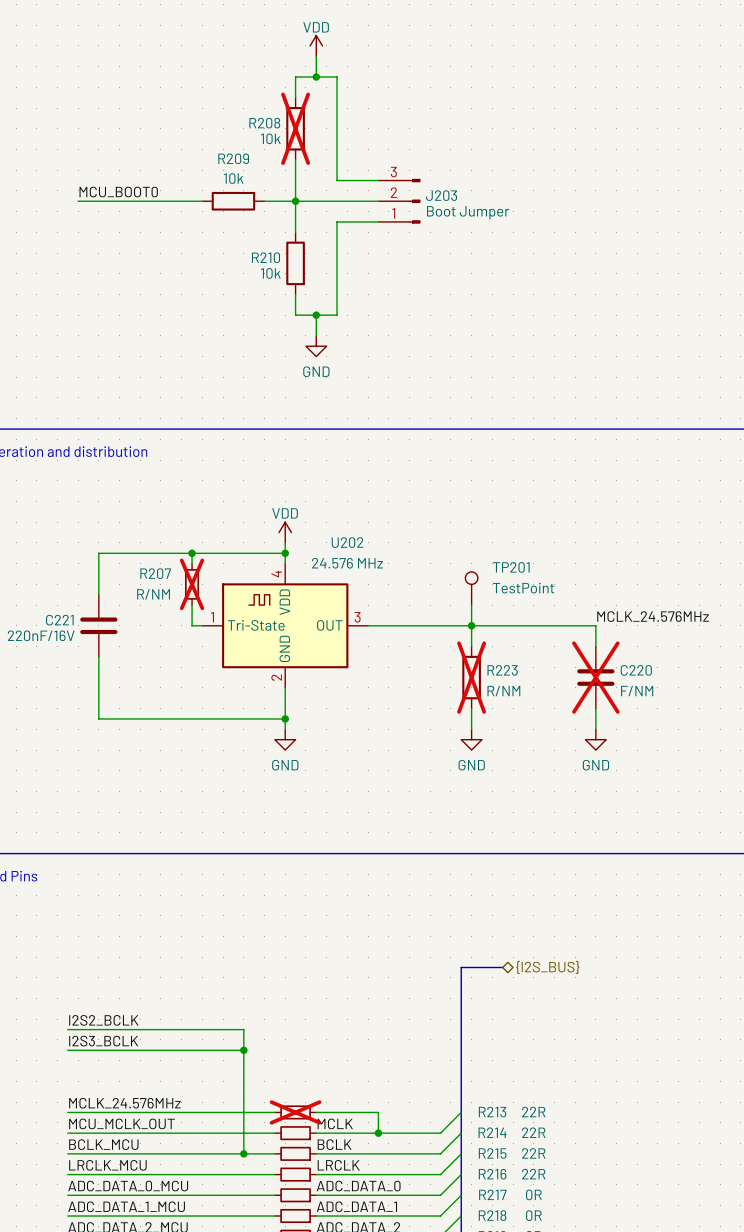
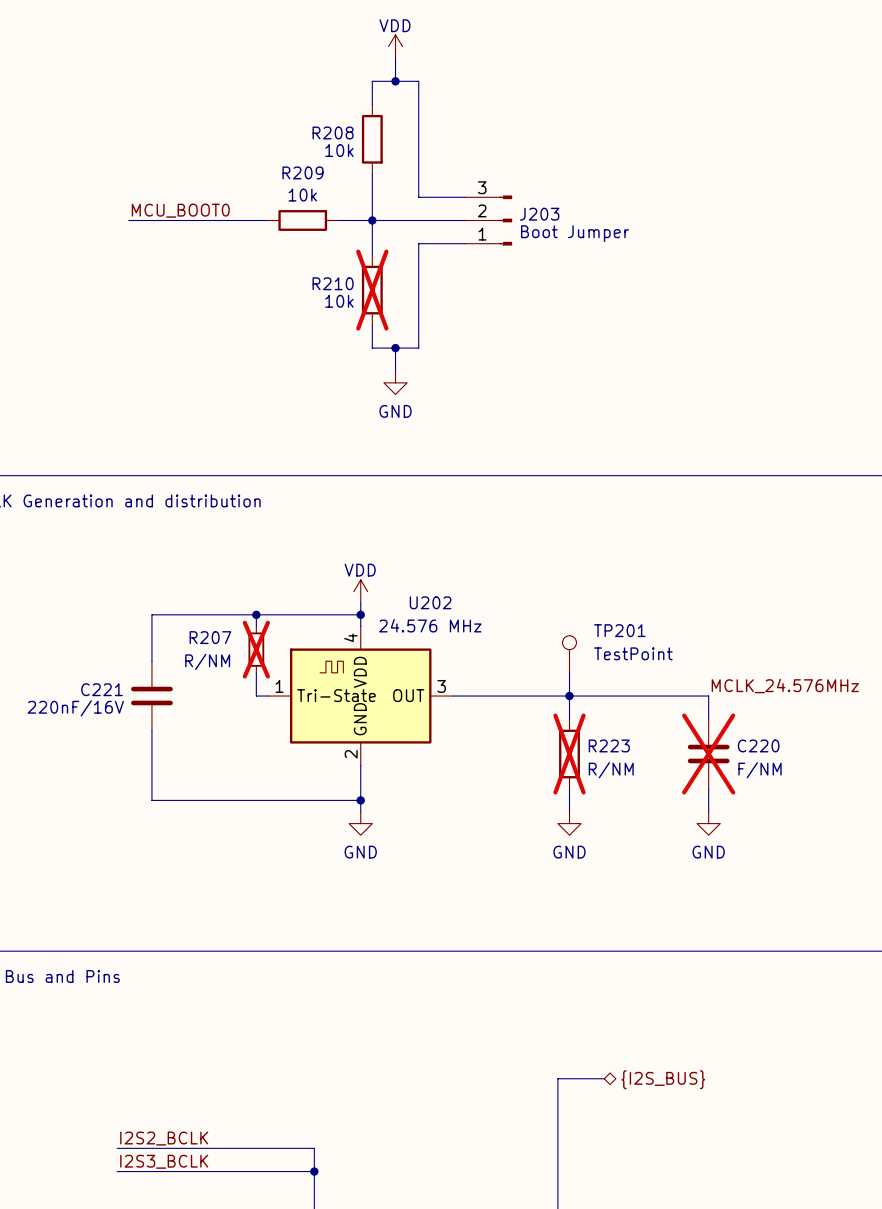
R208 do-not-place cross: (295, 128) -> none
R210 do-not-place cross: none -> (372, 290)

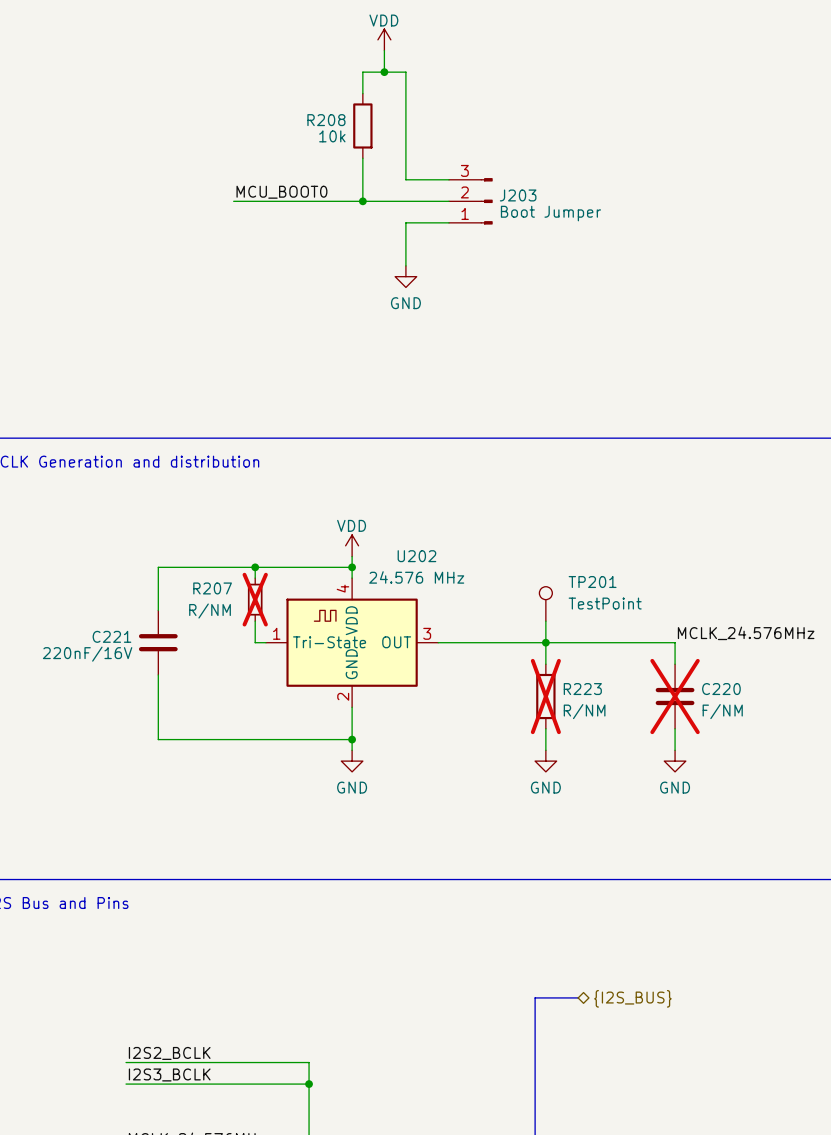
label position: MCU_BOOT0 (180, 210) -> MCU_BOOT0 (281, 192)
wire: (128, 220) (233, 220) -> none
wire: none -> (265, 201) (330, 201)
R209: 10k (302, 220) -> none
wire: (372, 220) (372, 255) -> none
R210: 10k (372, 290) -> none
wire: (418, 290) (418, 348) (372, 348) (372, 324) -> none
wire: (395, 348) (395, 371) -> none
junction: (395, 348) -> none
power symbol position: GND (395, 382) -> GND (405, 276)

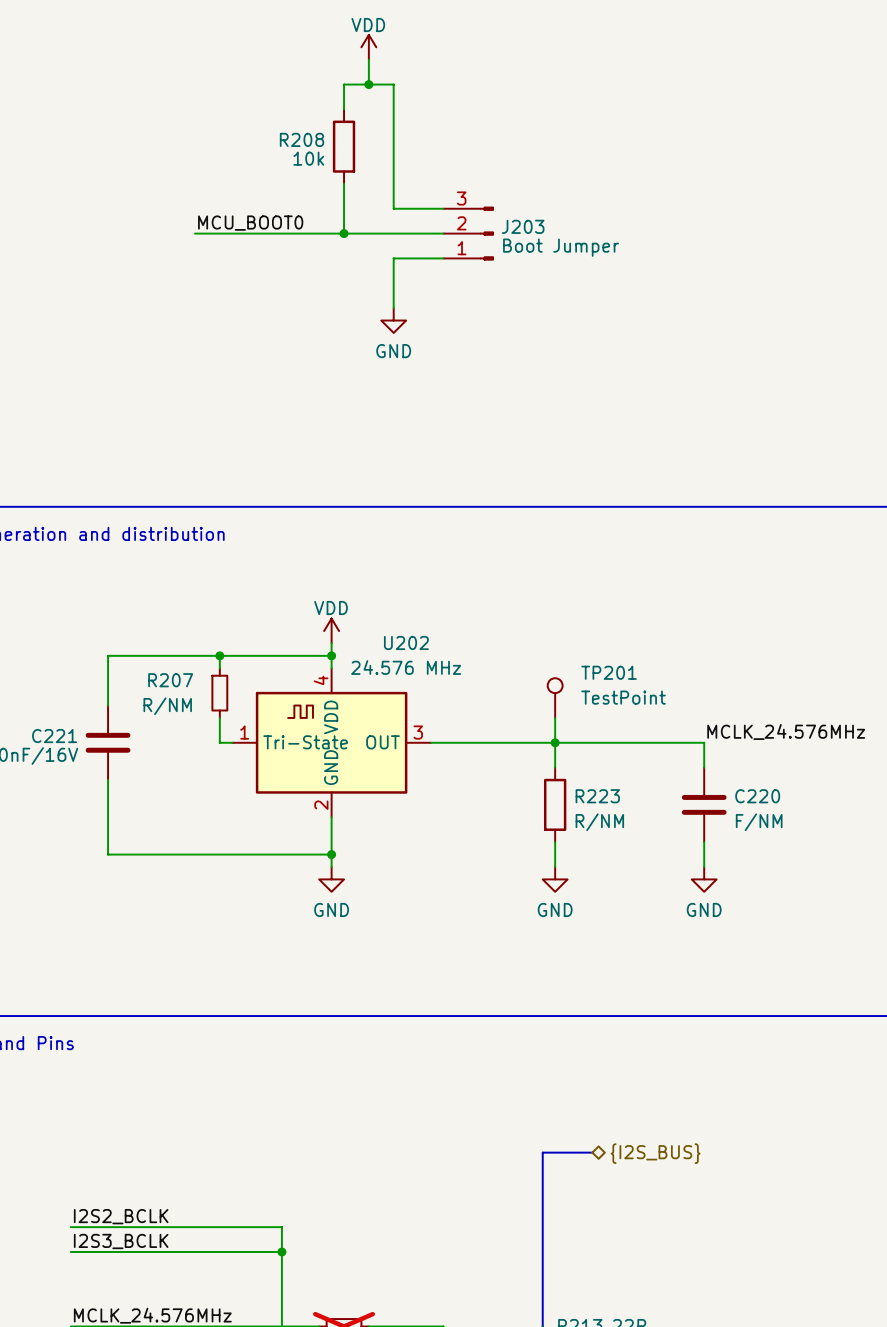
R207 do-not-place cross: (255, 599) -> none
R223 do-not-place cross: (545, 696) -> none
C220 do-not-place cross: (675, 696) -> none

